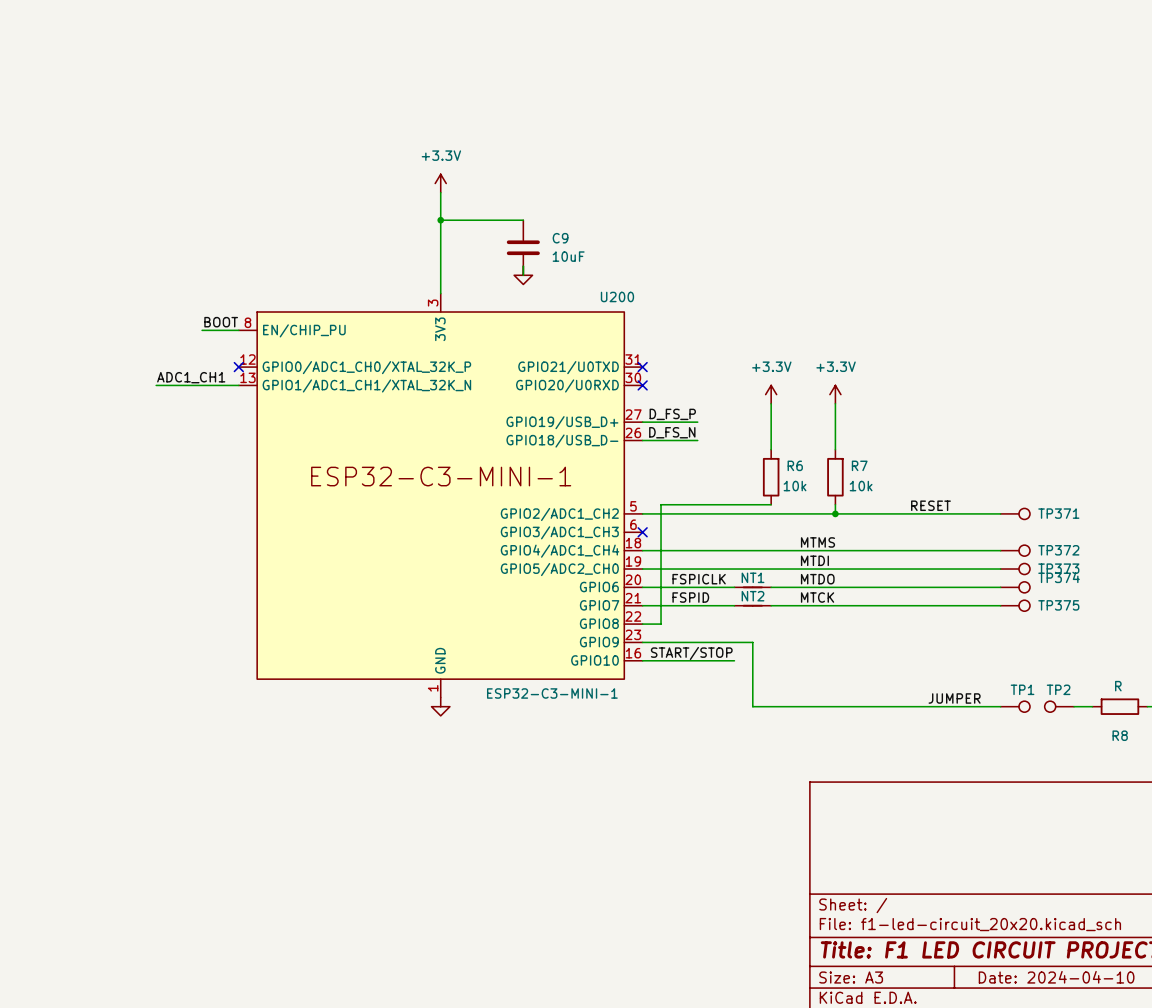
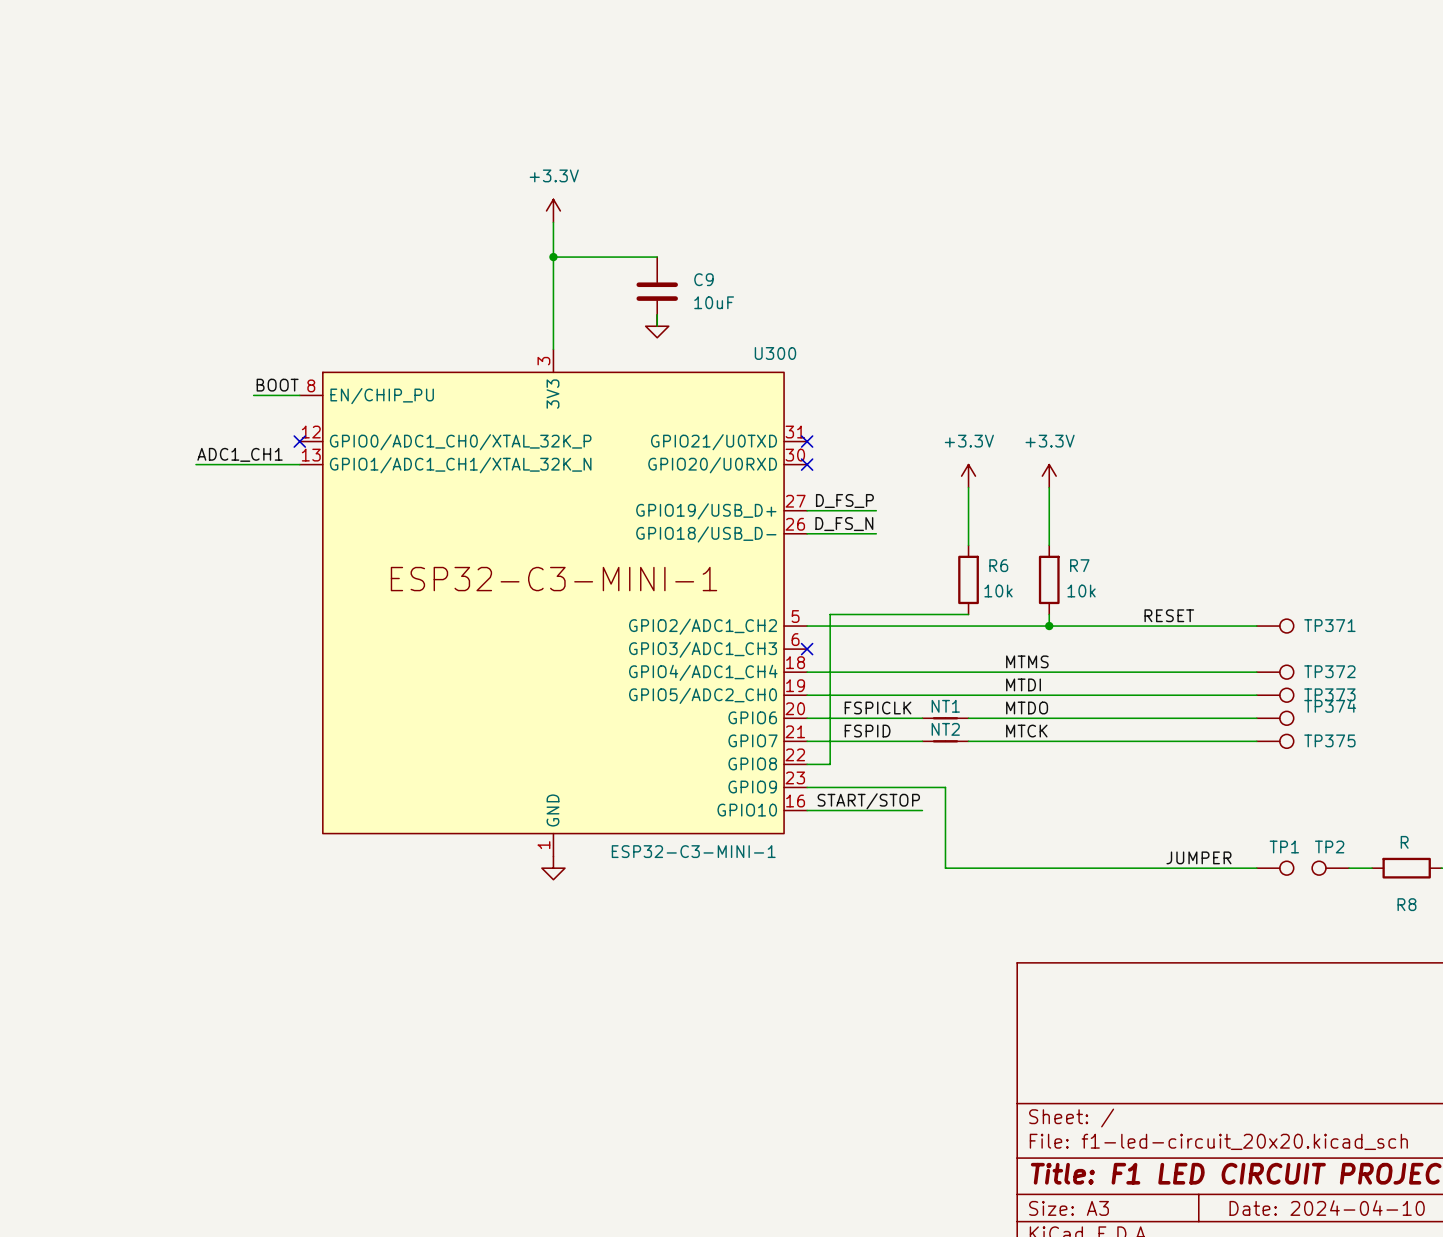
U200 name: U200 (617, 296) -> U300 (775, 353)

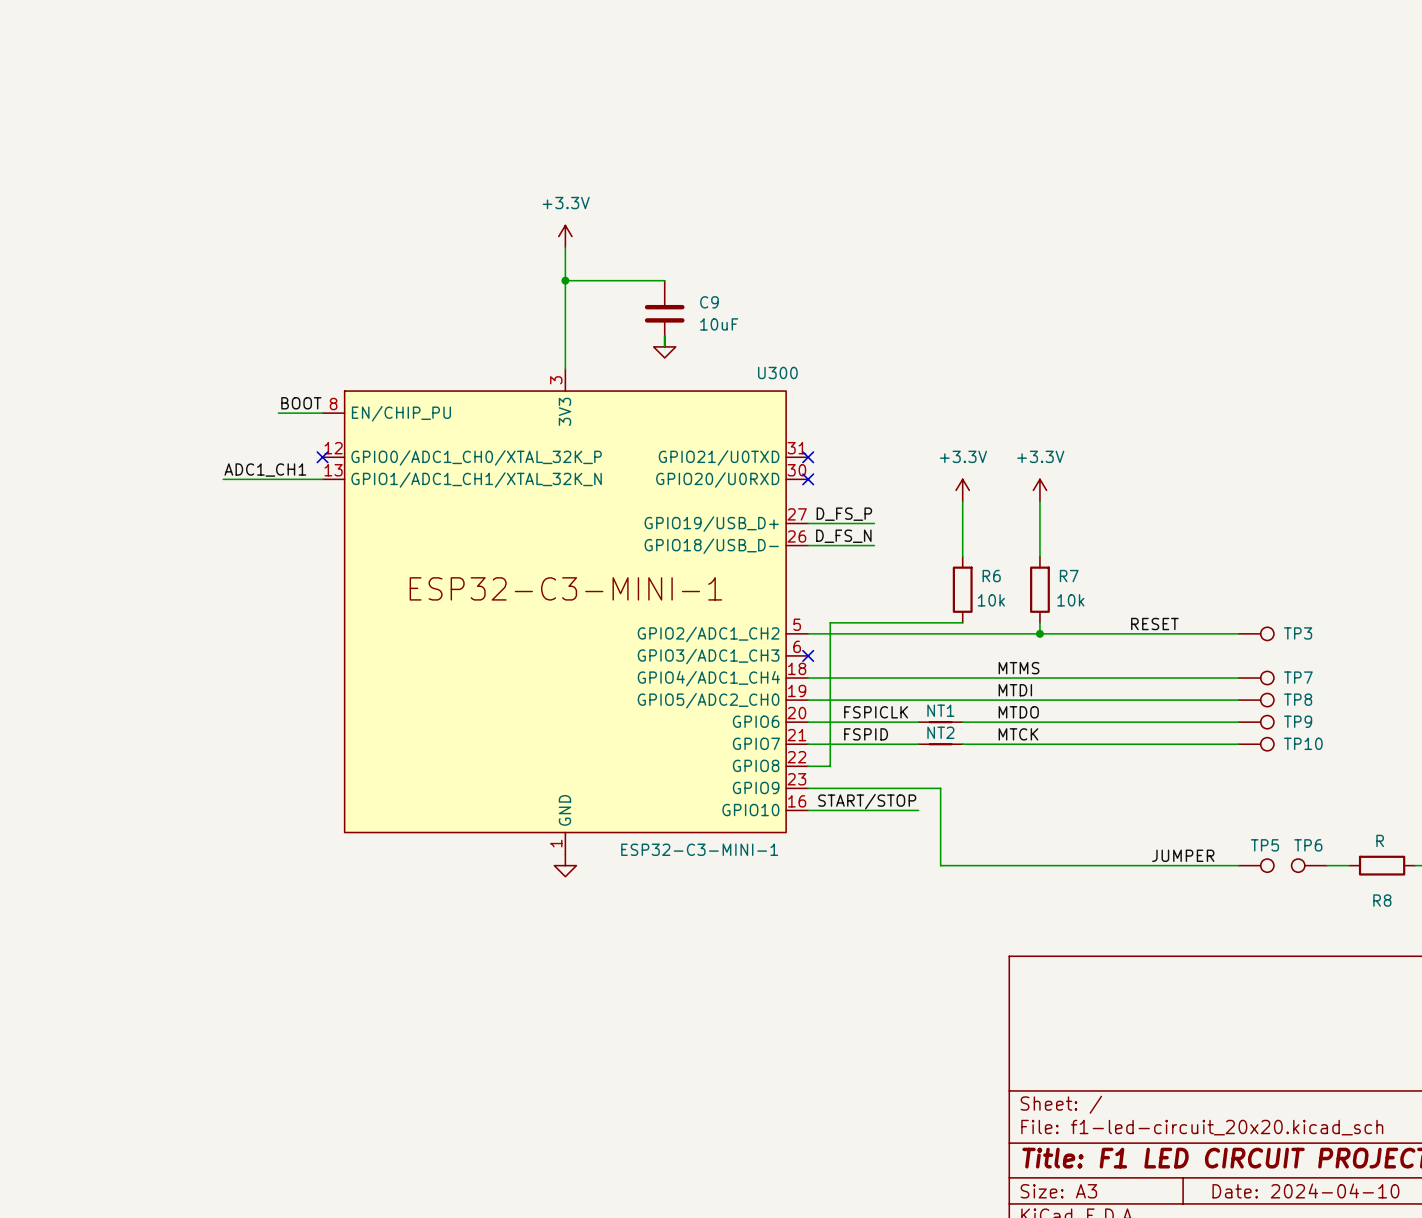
TP371 name: TP371 (1329, 625) -> TP3 (1298, 633)
TP372 name: TP372 (1329, 671) -> TP7 (1298, 677)
TP373 name: TP373 (1329, 694) -> TP8 (1298, 699)
TP374 name: TP374 (1330, 706) -> TP9 (1298, 721)
TP375 name: TP375 (1329, 740) -> TP10 (1303, 743)
TP1 name: TP1 (1284, 846) -> TP5 (1264, 845)
TP2 name: TP2 (1329, 846) -> TP6 (1308, 845)

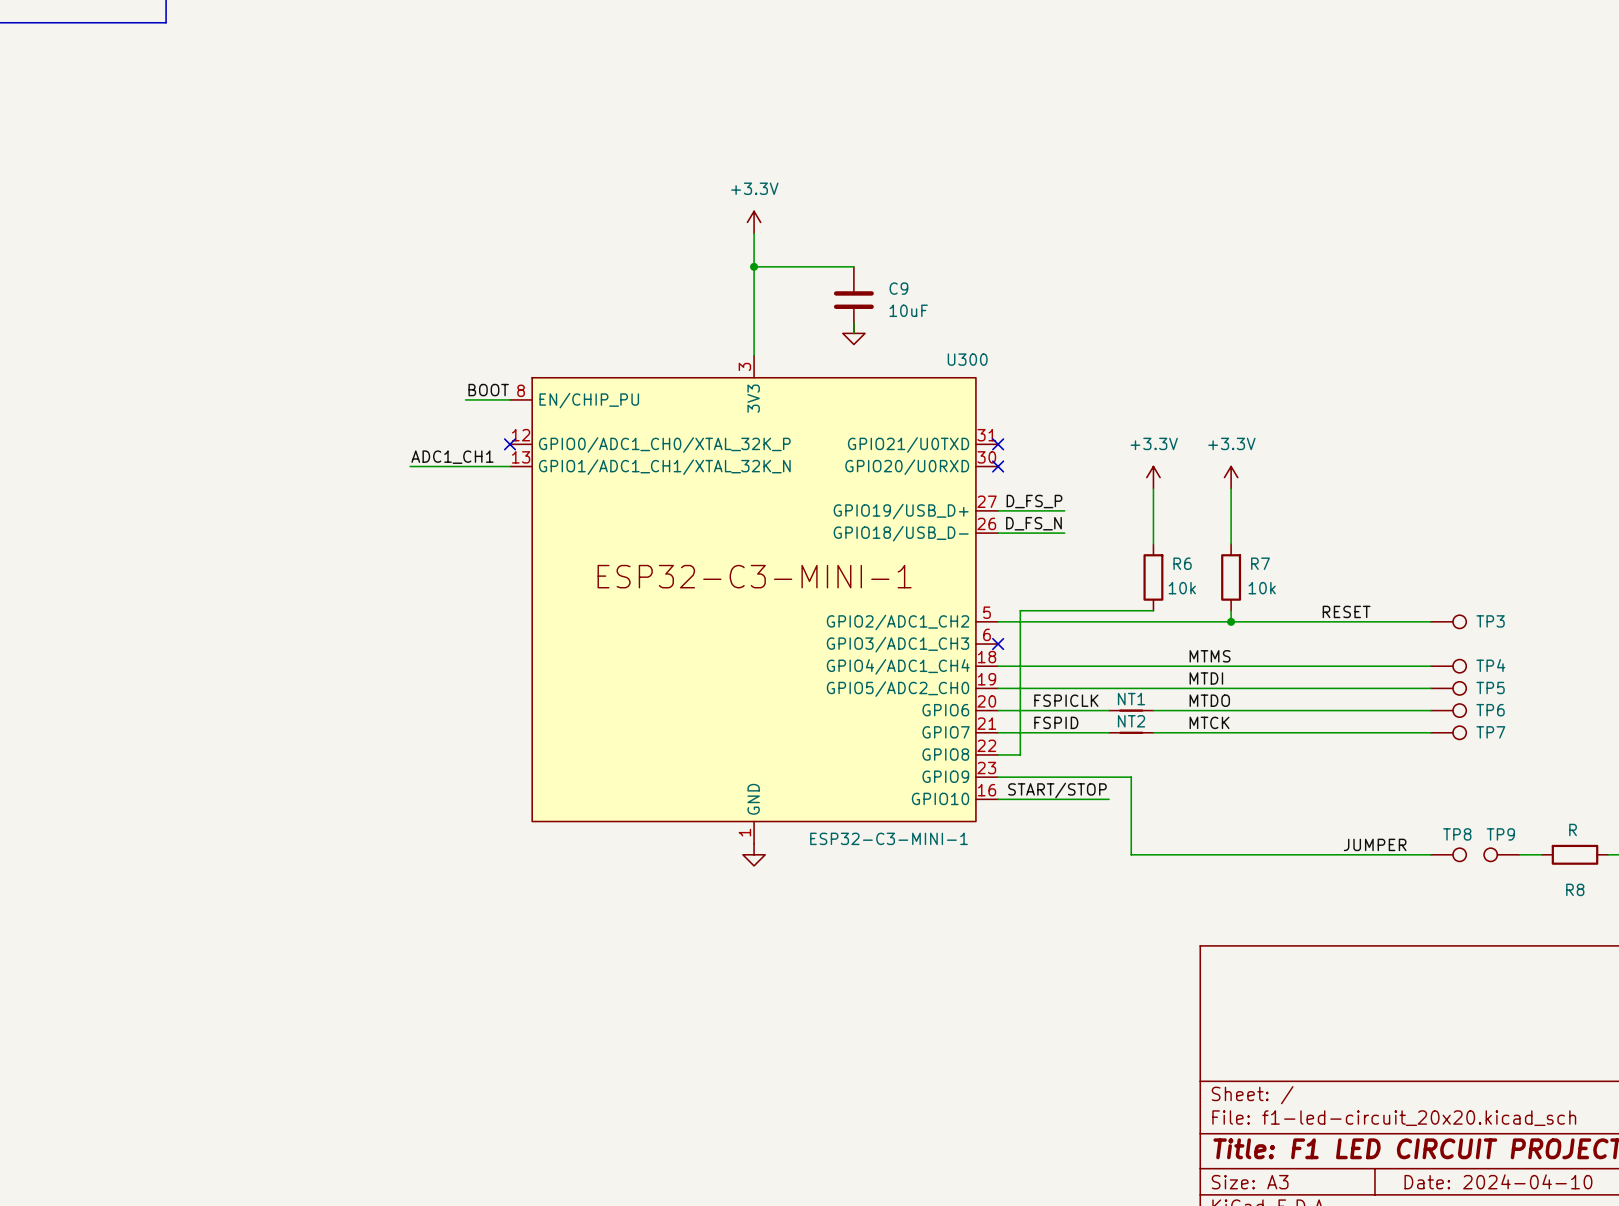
TP7 name: TP7 (1298, 677) -> TP4 (1490, 665)
TP8 name: TP8 (1298, 699) -> TP5 (1490, 687)
TP9 name: TP9 (1298, 721) -> TP6 (1490, 710)
TP10 name: TP10 (1303, 743) -> TP7 (1490, 732)
TP5 name: TP5 (1264, 845) -> TP8 (1457, 834)
TP6 name: TP6 (1308, 845) -> TP9 (1500, 834)

